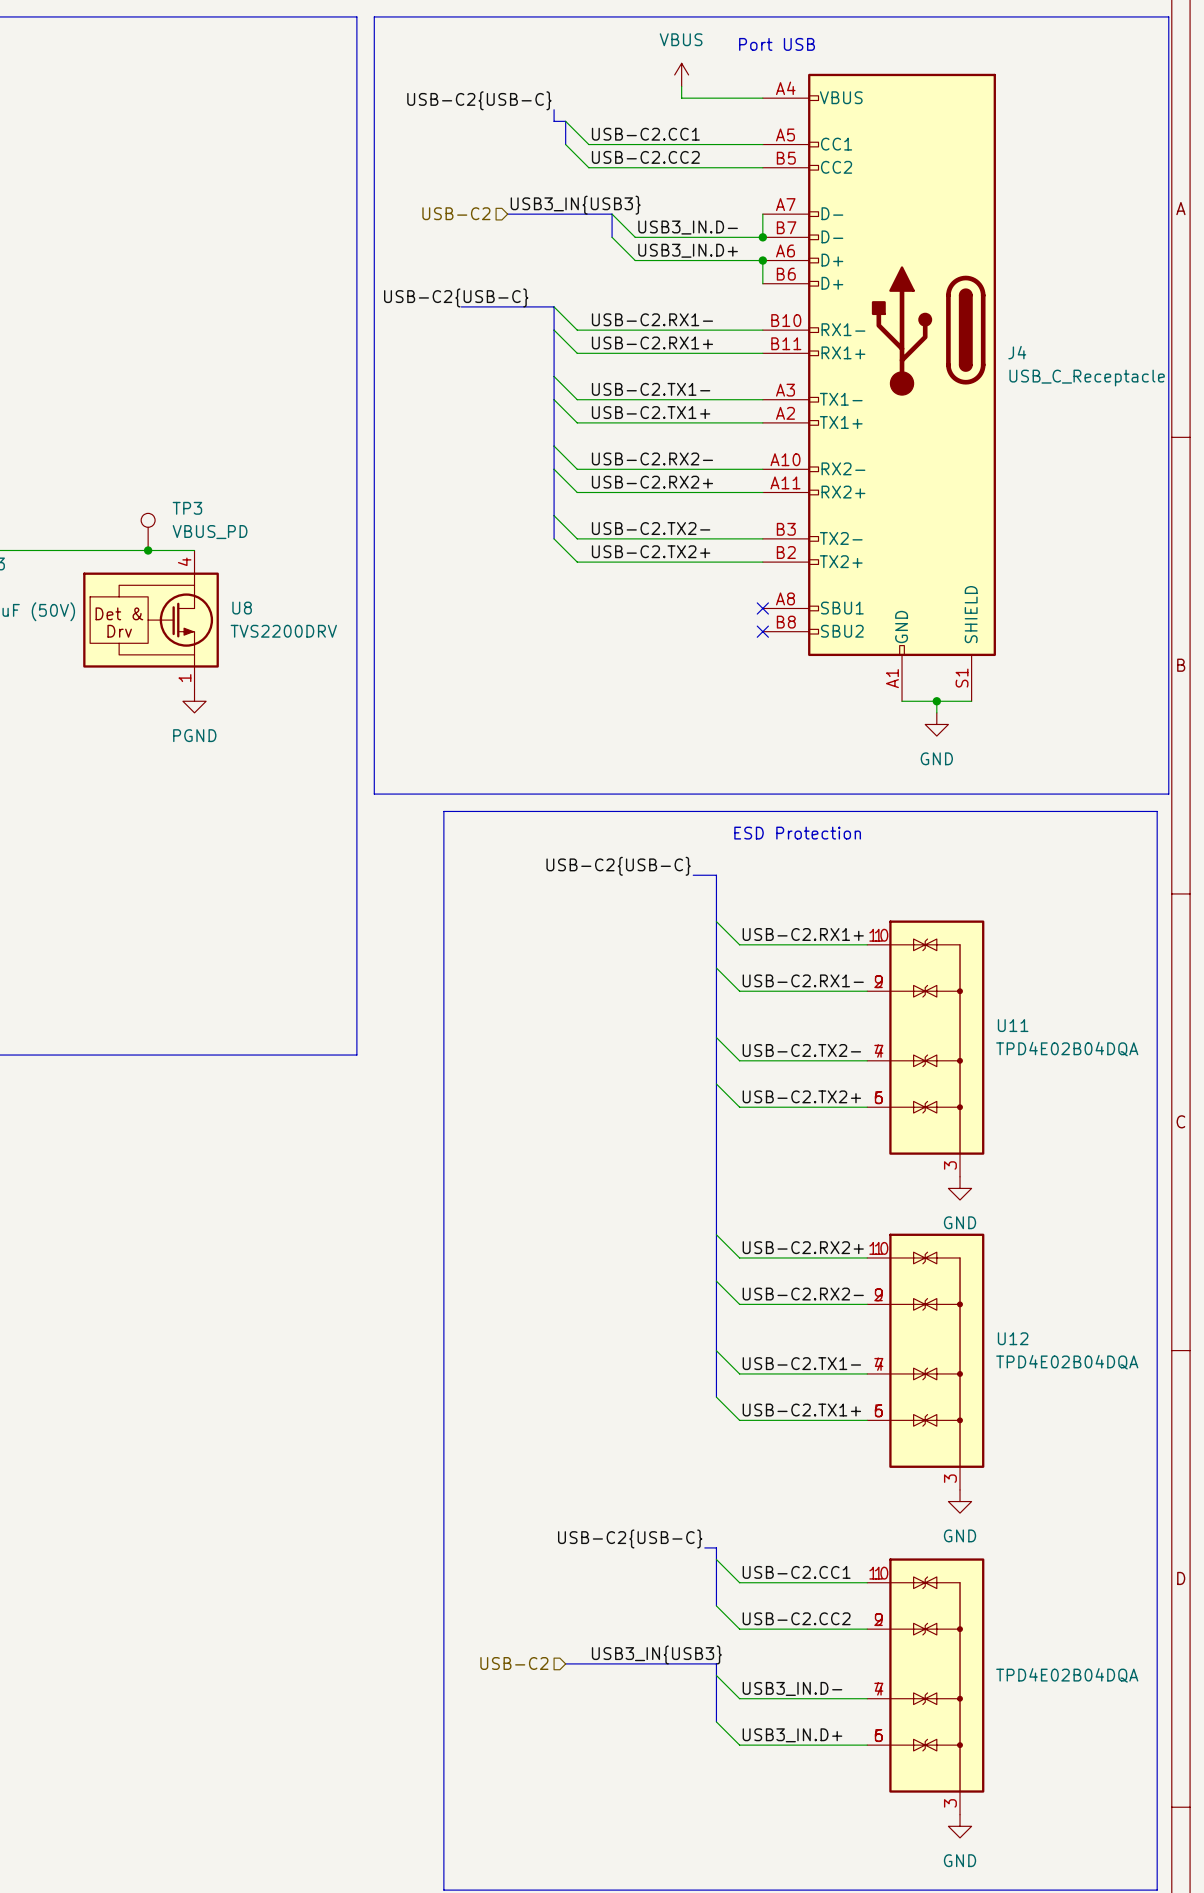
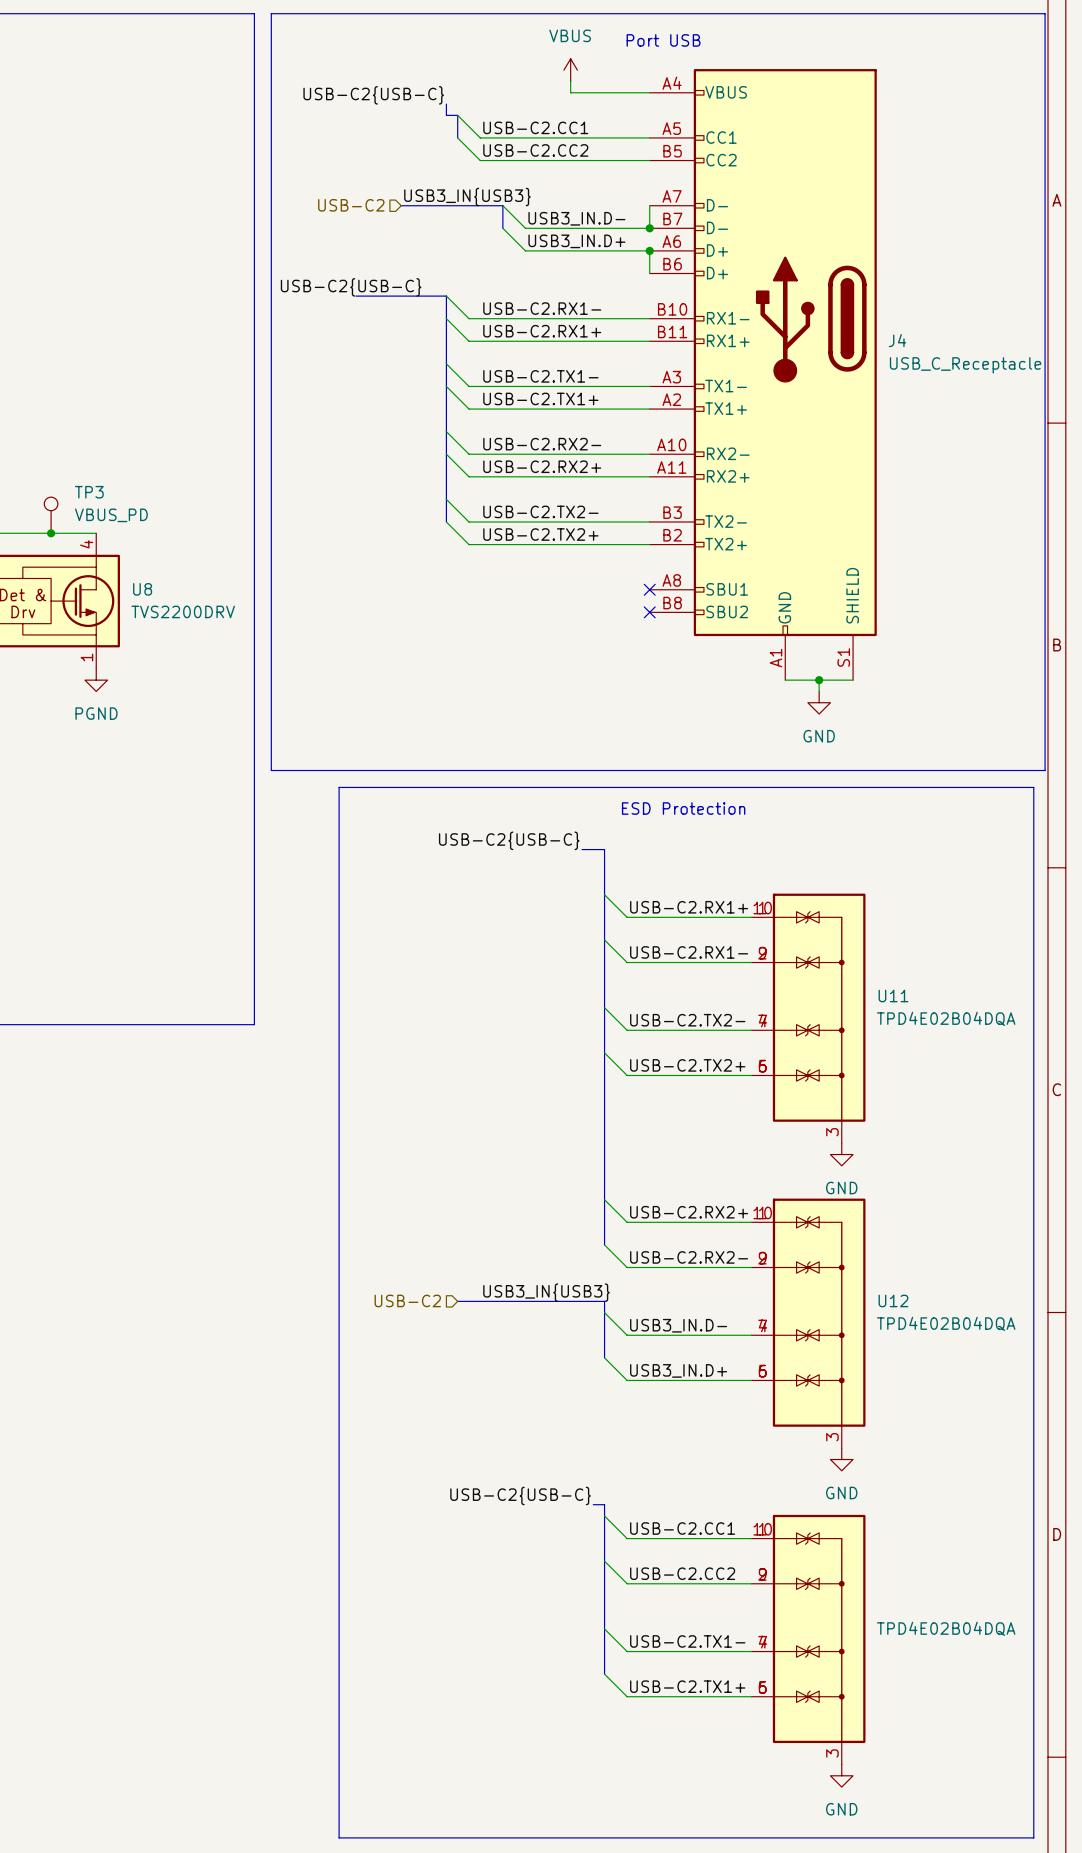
bus: (716, 1281) (716, 1339) -> (457, 1301) (604, 1301)
label: none -> USB3_IN{USB3} (546, 1292)
hierarchical label: none -> USB-C2 (407, 1300)
label: USB-C2.TX1- (801, 1363) -> USB3_IN.D- (678, 1325)
label: USB-C2.TX1+ (801, 1410) -> USB3_IN.D+ (678, 1370)
label: USB3_IN{USB3} (656, 1654) -> none
hierarchical label: USB-C2 (514, 1663) -> none
bus: (565, 1663) (716, 1663) -> (604, 1561) (604, 1617)
label: USB3_IN.D- (792, 1688) -> USB-C2.TX1- (687, 1641)
label: USB3_IN.D+ (792, 1735) -> USB-C2.TX1+ (687, 1686)

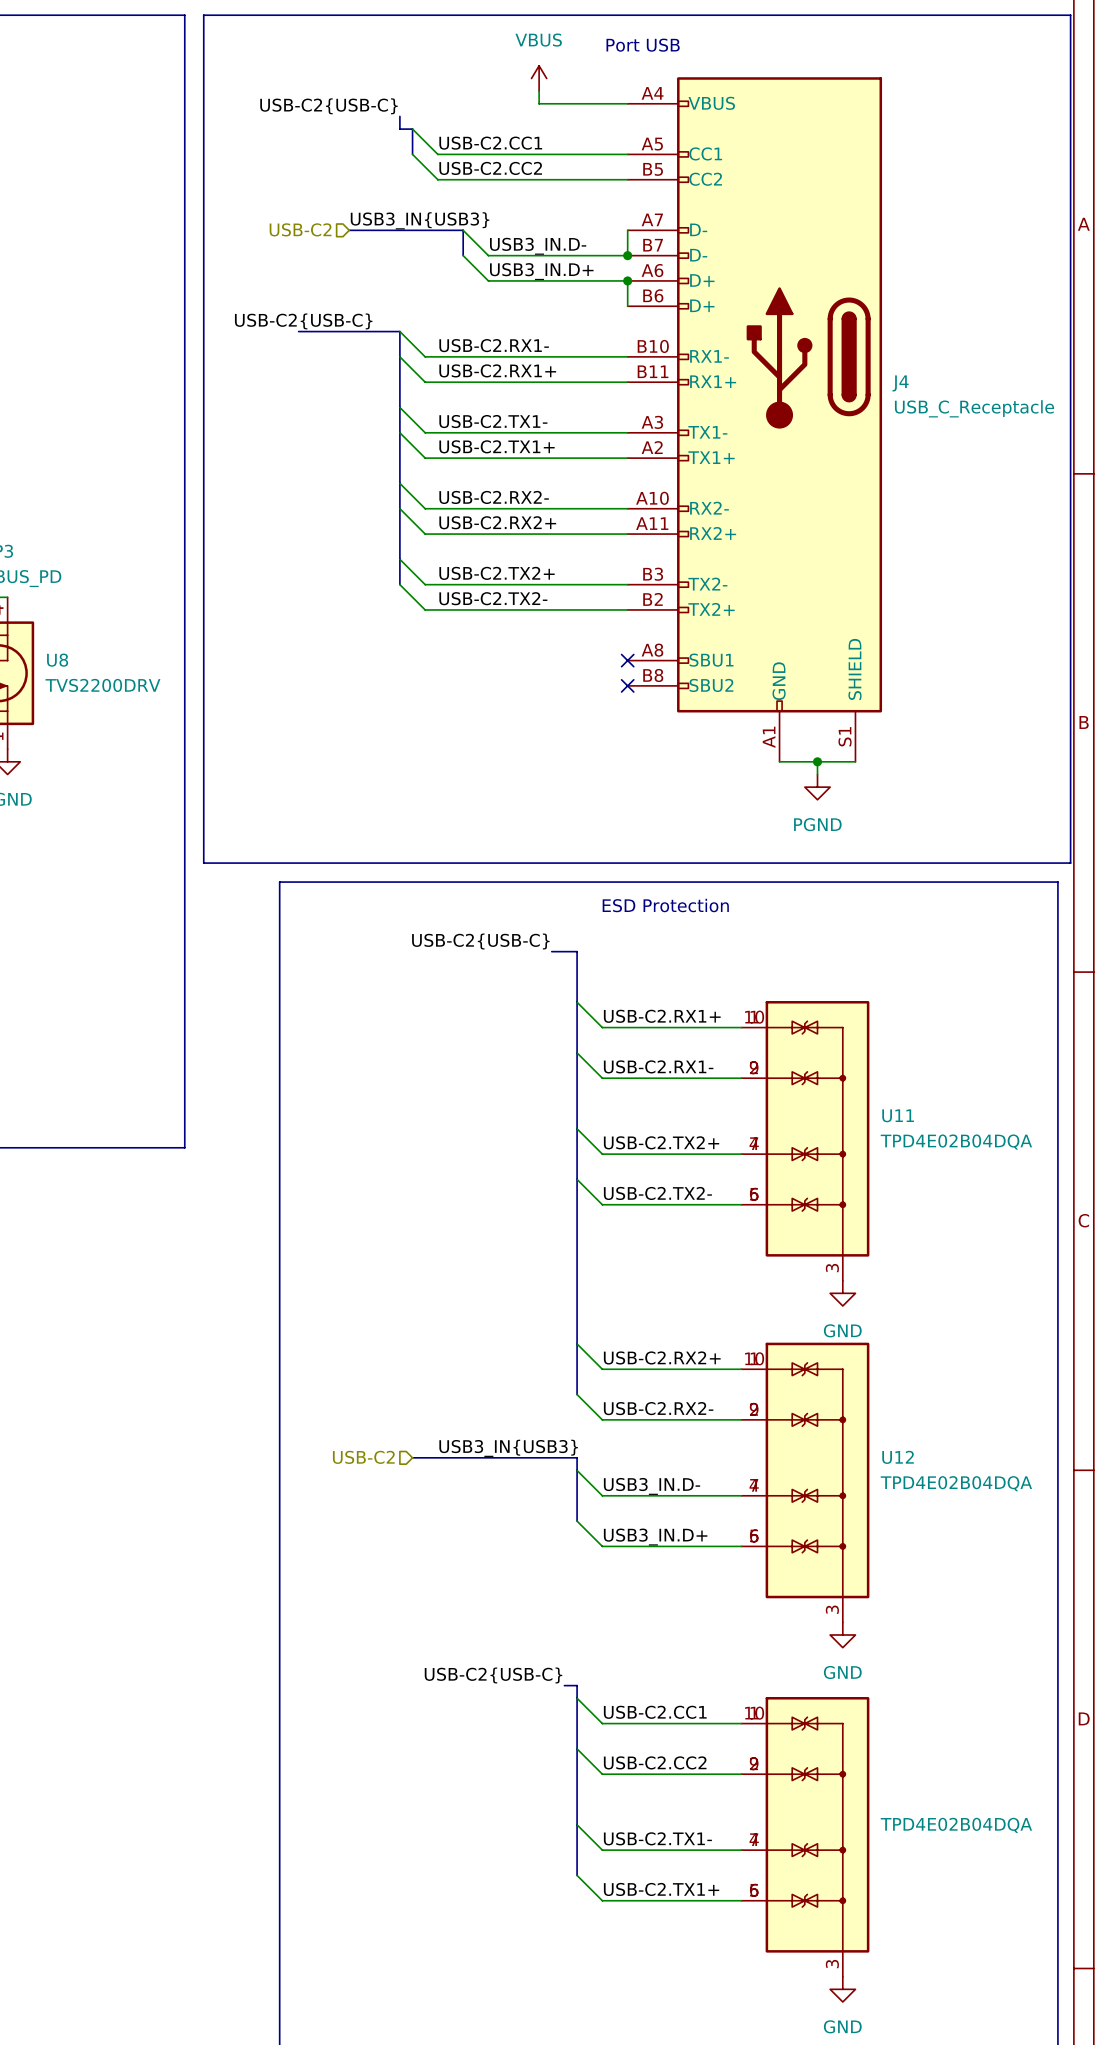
label: USB-C2.TX2- (540, 511) -> USB-C2.TX2+ (497, 573)
label: USB-C2.TX2+ (540, 534) -> USB-C2.TX2- (493, 598)
power symbol: GND (819, 702) -> PGND (817, 787)
label: USB-C2.TX2- (687, 1020) -> USB-C2.TX2+ (661, 1142)
label: USB-C2.TX2+ (687, 1065) -> USB-C2.TX2- (657, 1193)

